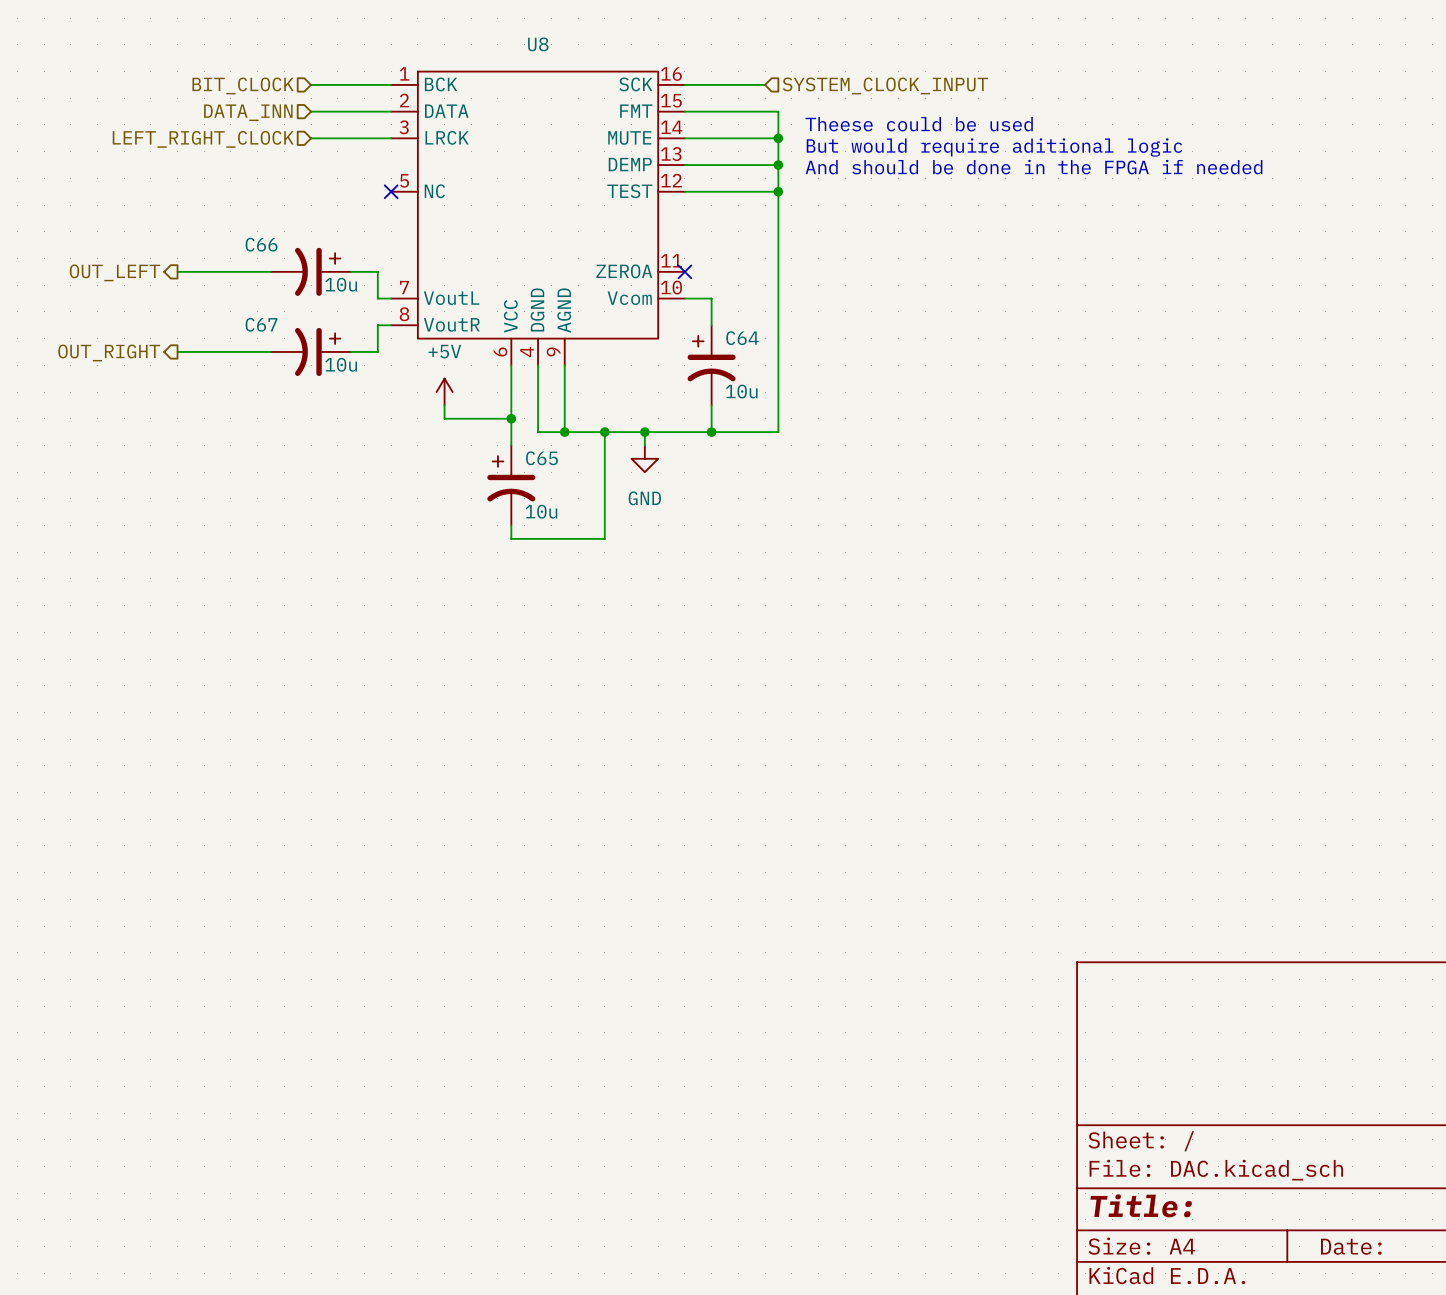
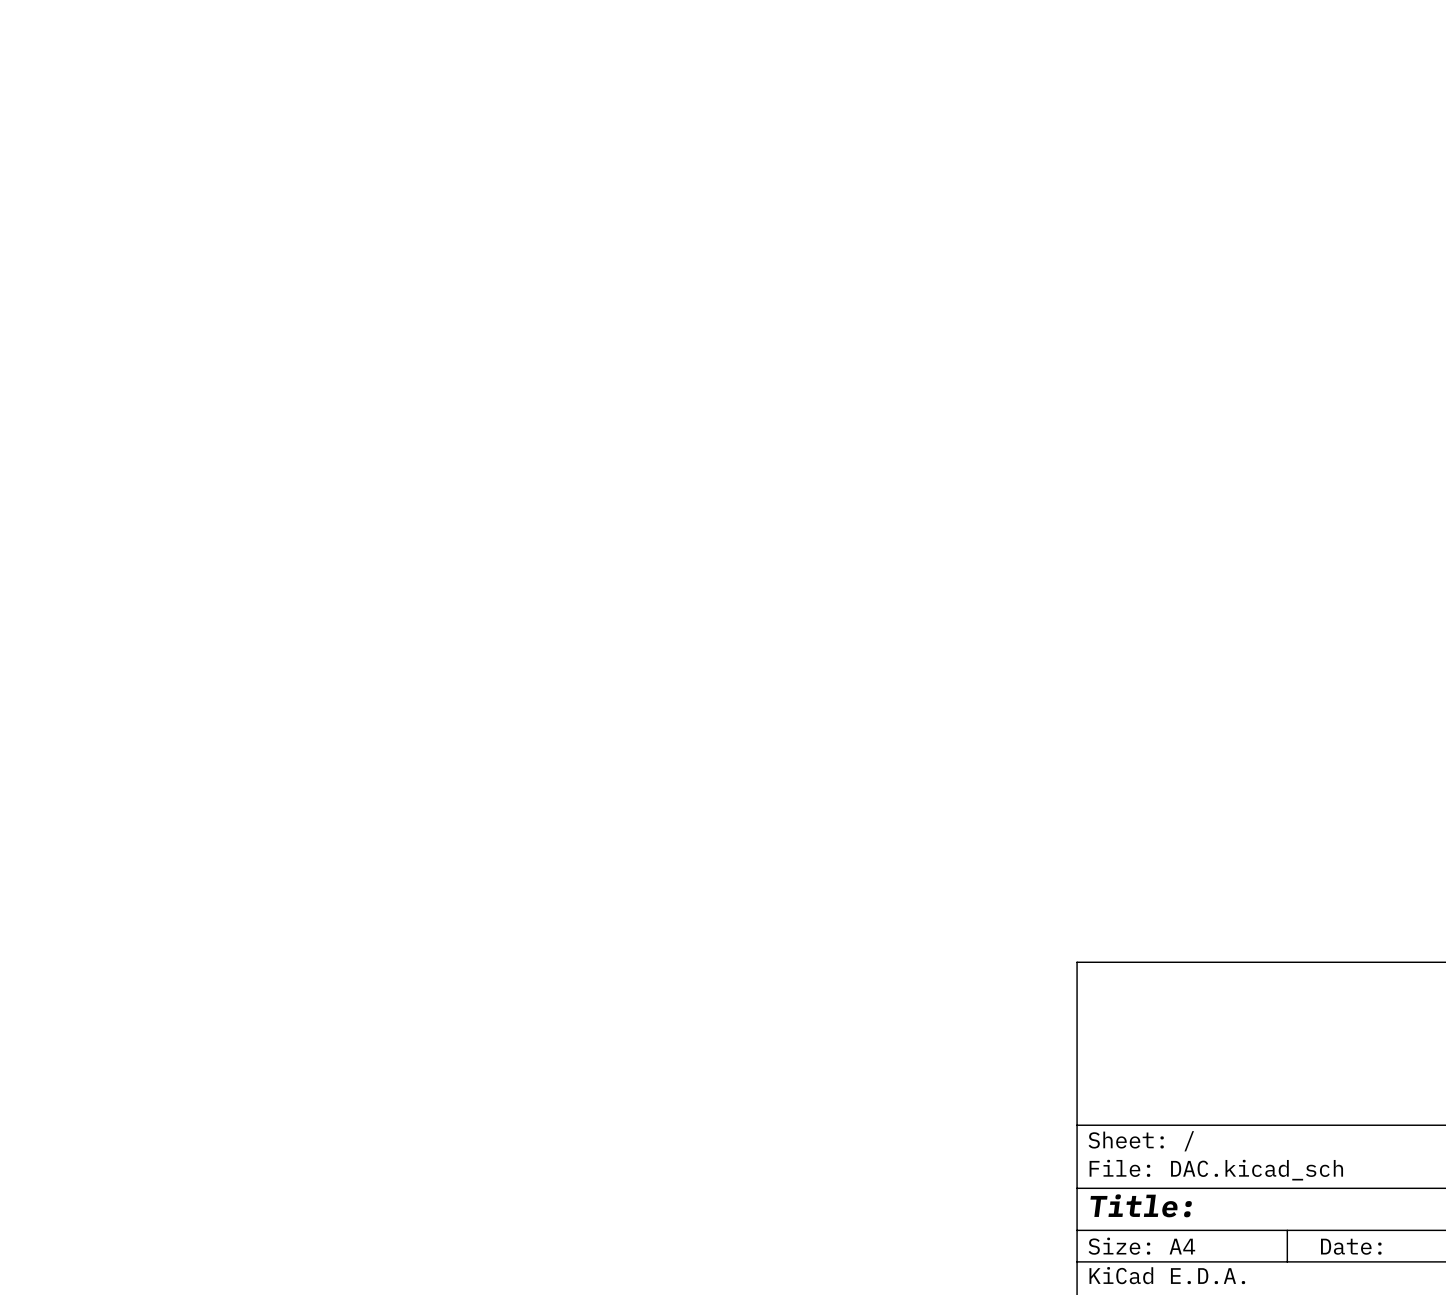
wire: (311, 84) (391, 84) -> none
wire: (684, 84) (765, 84) -> none
hierarchical label: BIT_CLOCK (243, 85) -> none
hierarchical label: SYSTEM_CLOCK_INPUT (885, 85) -> none
wire: (311, 111) (391, 111) -> none
wire: (684, 111) (778, 111) (778, 432) (538, 432) (538, 365) -> none
hierarchical label: DATA_INN (248, 112) -> none
text: Theese could be used (919, 124) -> none
wire: (311, 138) (391, 138) -> none
wire: (684, 138) (778, 138) -> none
junction: (778, 138) -> none
hierarchical label: LEFT_RIGHT_CLOCK (203, 139) -> none
text: But would require aditional logic (994, 147) -> none
wire: (684, 165) (778, 165) -> none
junction: (778, 165) -> none
text: And should be done in the FPGA if needed (1034, 167) -> none
no-connect mark: (391, 191) -> none
wire: (684, 191) (778, 191) -> none
junction: (778, 191) -> none
U8: (538, 218) -> none
wire: (177, 271) (271, 271) -> none
C66: 10u (311, 271) -> none
wire: (351, 271) (377, 271) (377, 298) (391, 298) -> none
no-connect mark: (684, 271) -> none
hierarchical label: OUT_LEFT (114, 272) -> none
wire: (684, 298) (711, 298) (711, 325) -> none
wire: (391, 325) (377, 325) (377, 351) (351, 351) -> none
wire: (177, 351) (271, 351) -> none
C67: 10u (311, 351) -> none
hierarchical label: OUT_RIGHT (109, 352) -> none
wire: (511, 365) (511, 445) -> none
wire: (564, 365) (564, 432) -> none
C64: 10u (711, 365) -> none
power symbol: +5V (444, 392) -> none
wire: (444, 405) (444, 418) (511, 418) -> none
wire: (711, 405) (711, 432) -> none
junction: (511, 418) -> none
junction: (564, 432) -> none
wire: (604, 432) (604, 538) (511, 538) (511, 525) -> none
junction: (604, 432) -> none
wire: (644, 432) (644, 445) -> none
junction: (644, 432) -> none
junction: (711, 432) -> none
power symbol: GND (644, 458) -> none
C65: 10u (511, 485) -> none

